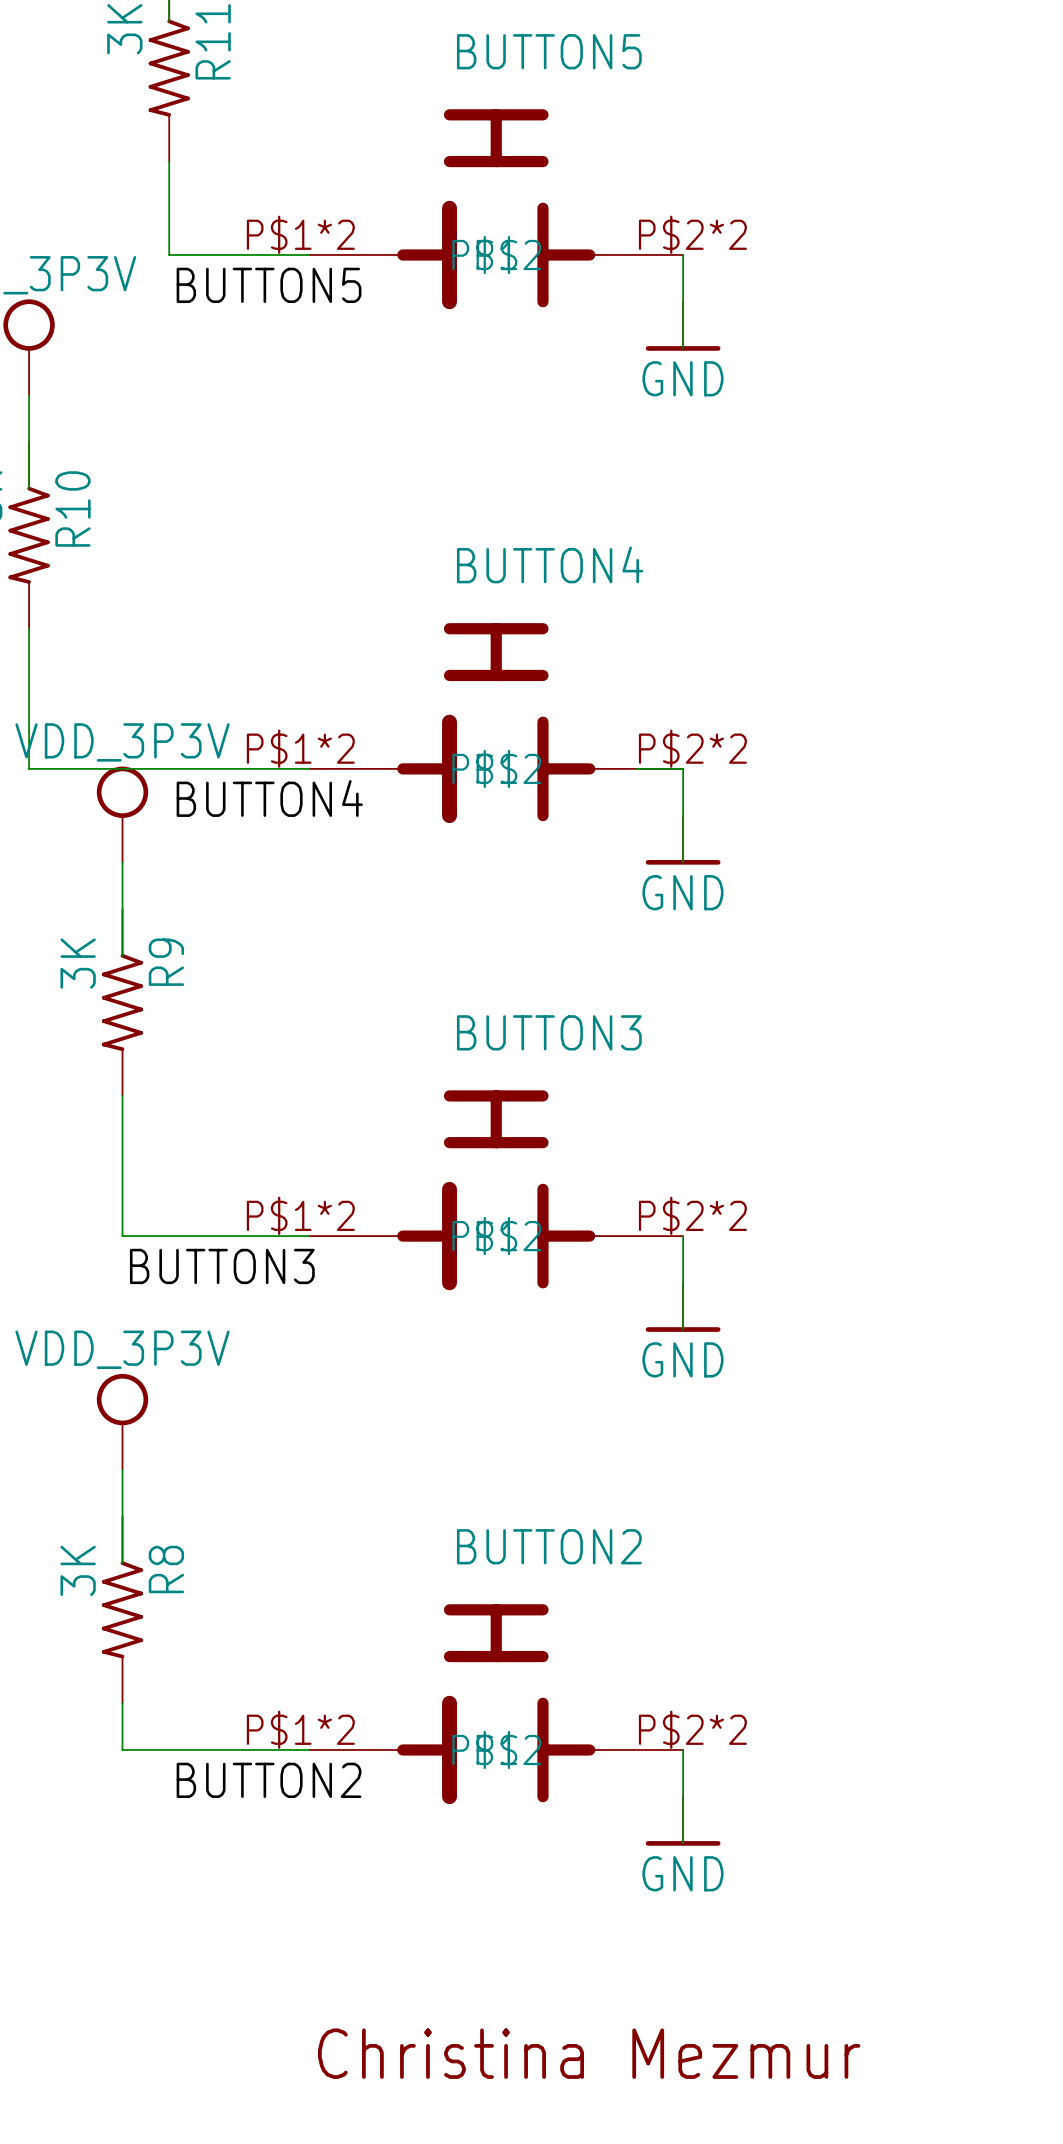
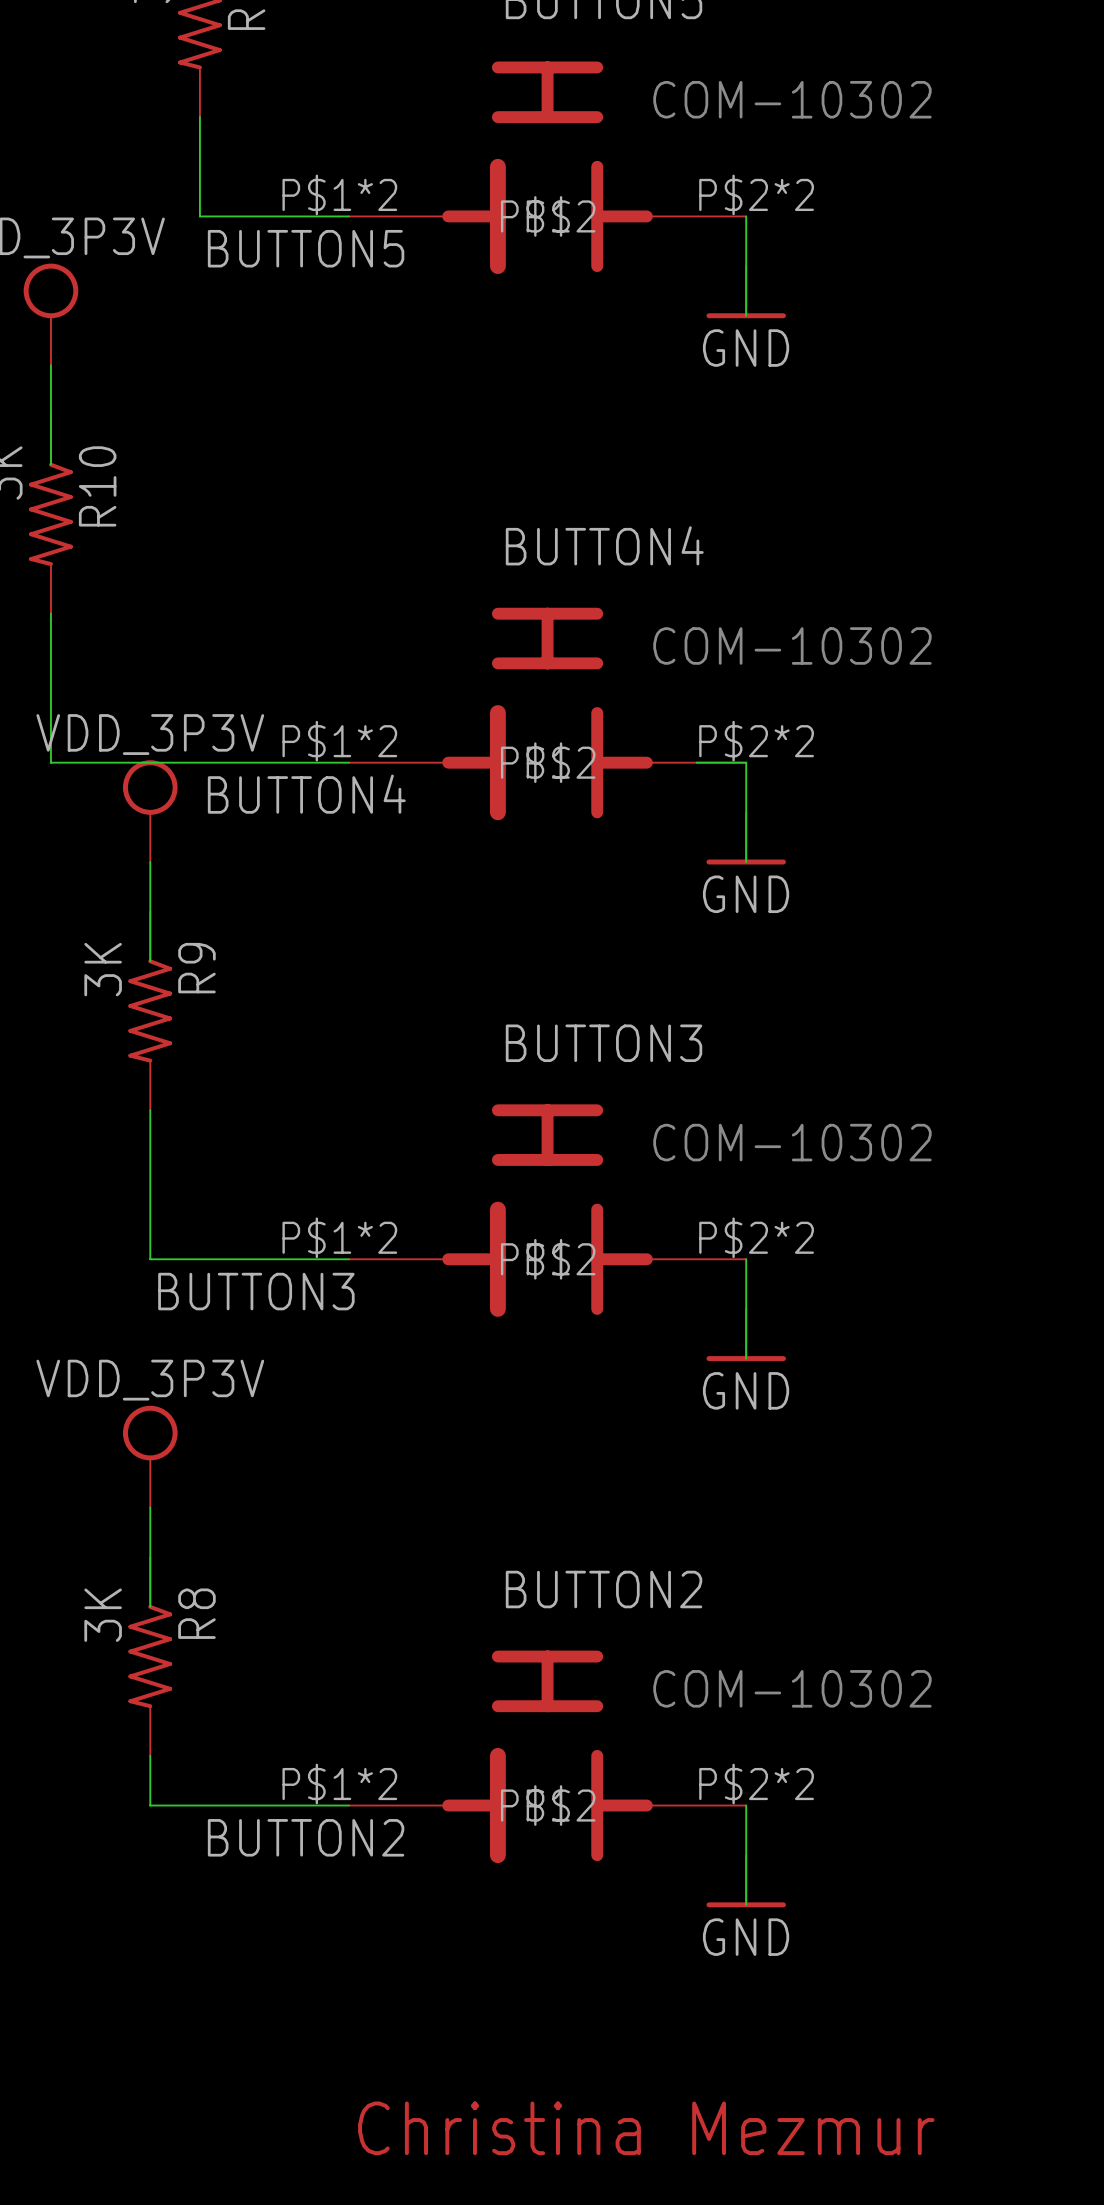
text: none -> COM-10302 (792, 99)
text: none -> COM-10302 (792, 645)
text: none -> COM-10302 (792, 1142)
text: none -> COM-10302 (792, 1688)

